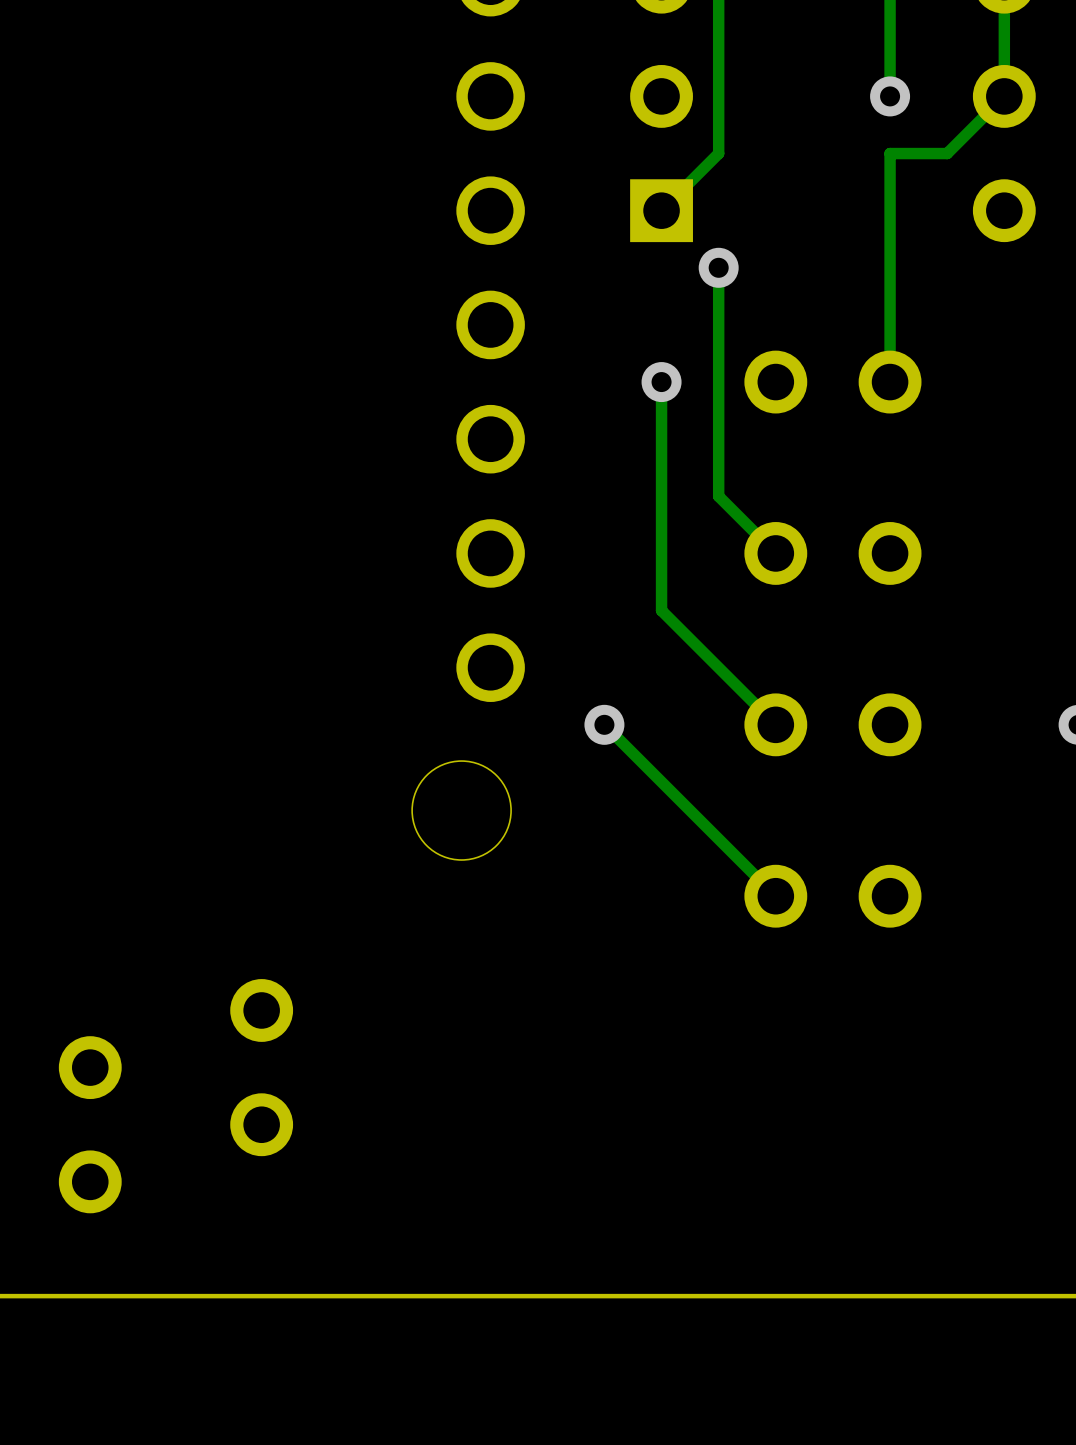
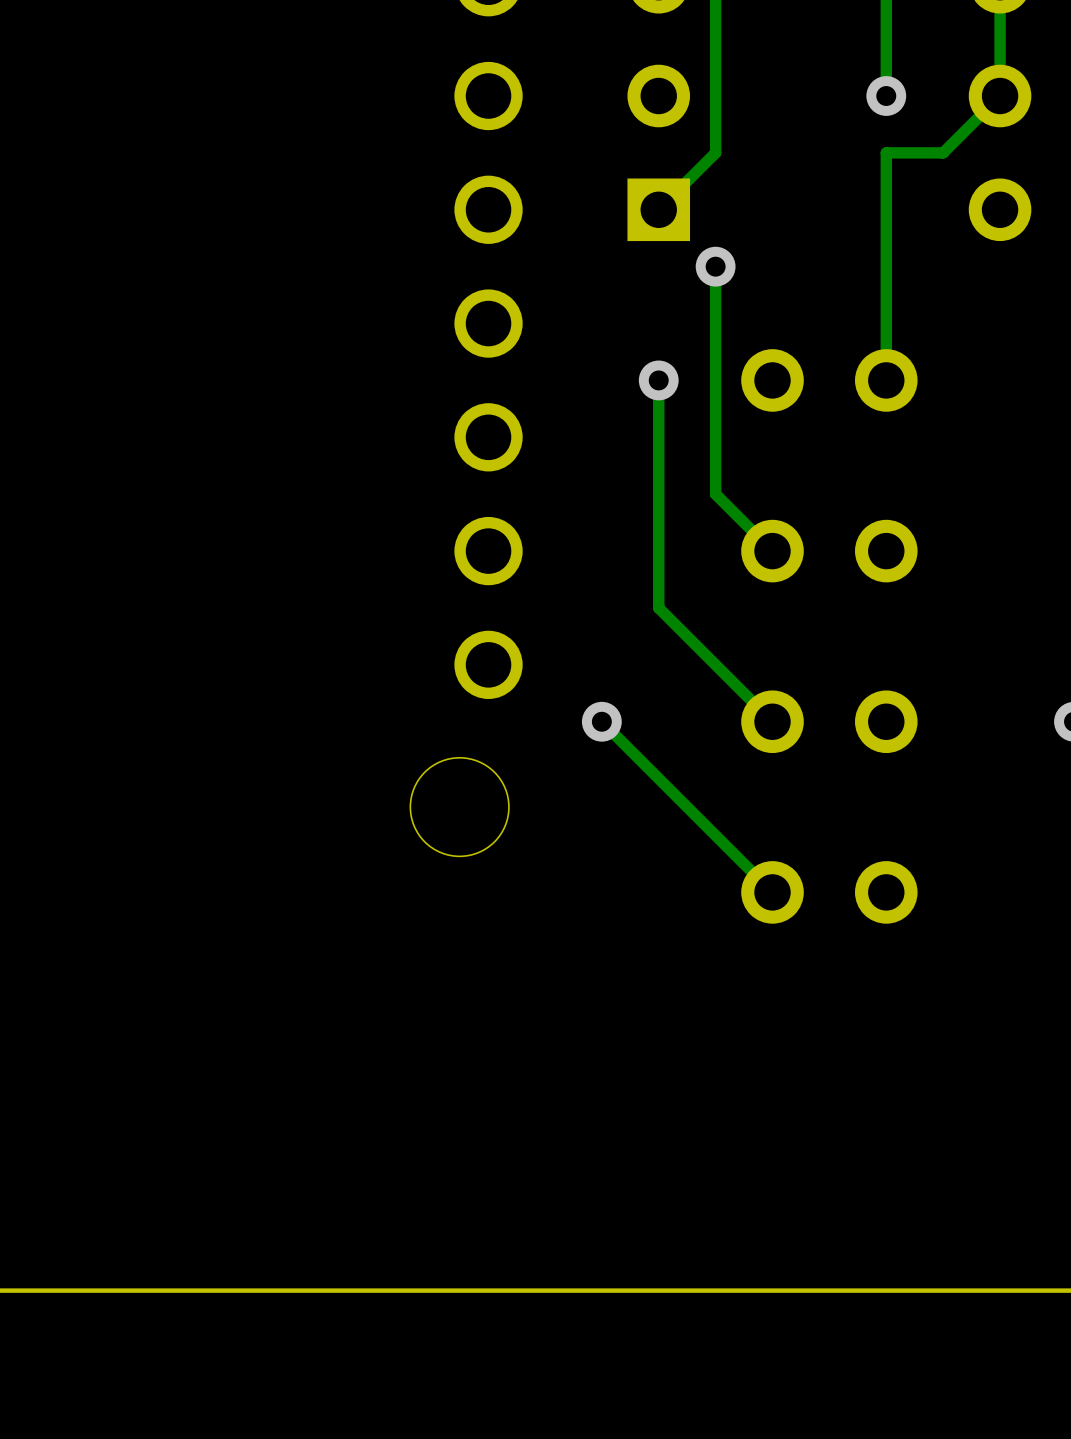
part: (261, 1067) -> none
part: (90, 1124) -> none

